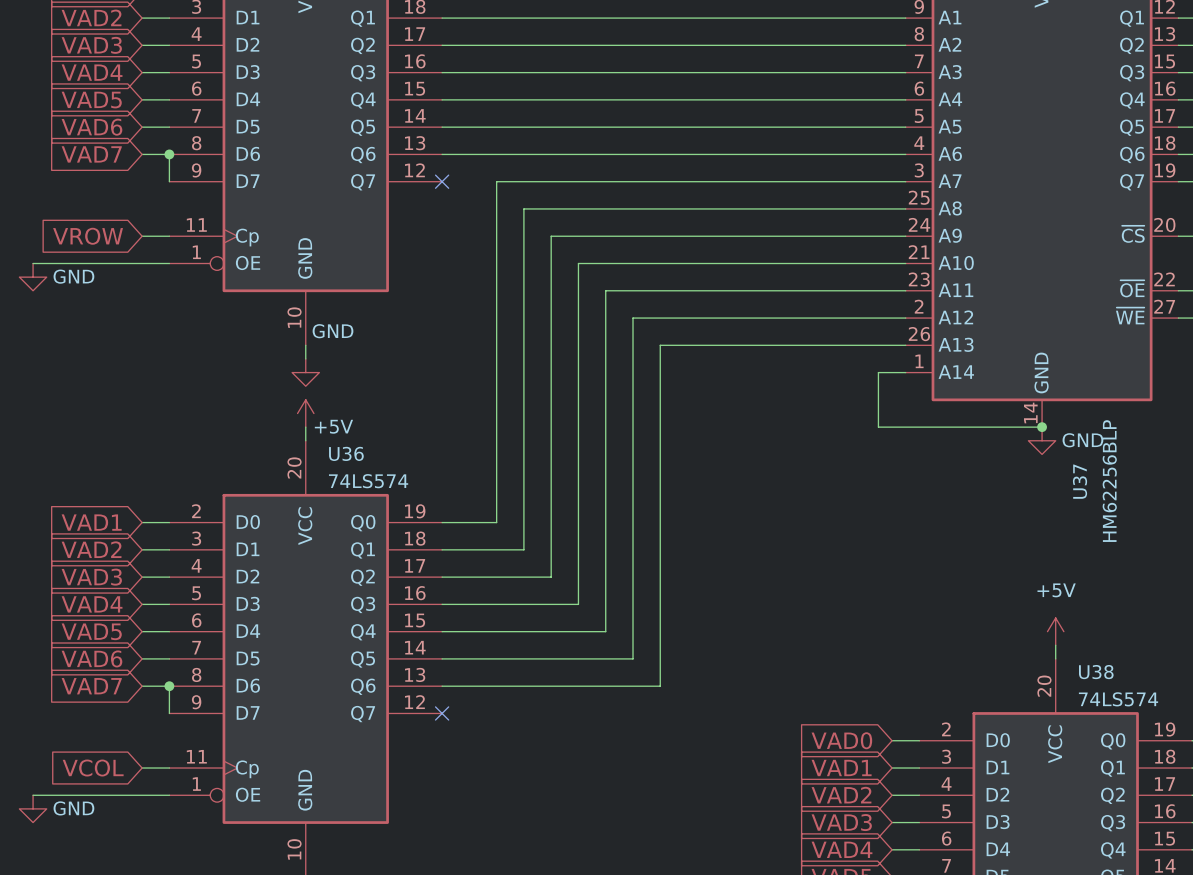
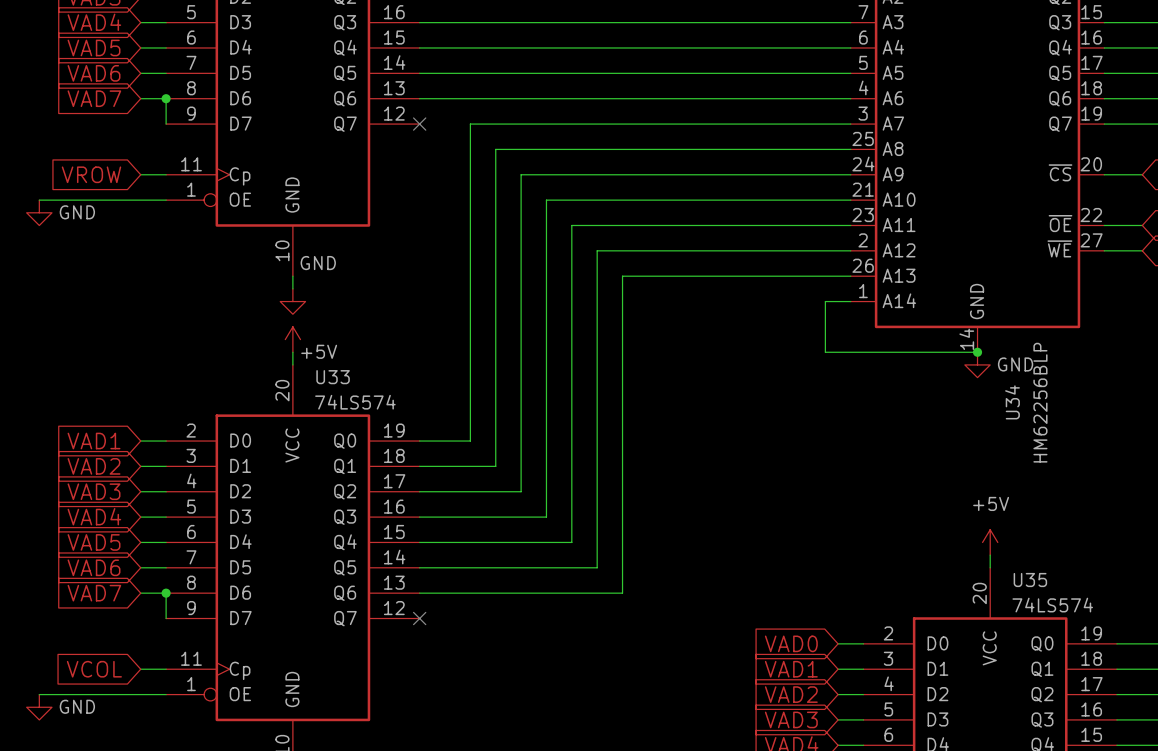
U36 name: U36 (346, 453) -> U33 (333, 377)
U37 name: U37 (1080, 481) -> U34 (1012, 402)
U38 name: U38 (1096, 672) -> U35 (1030, 580)

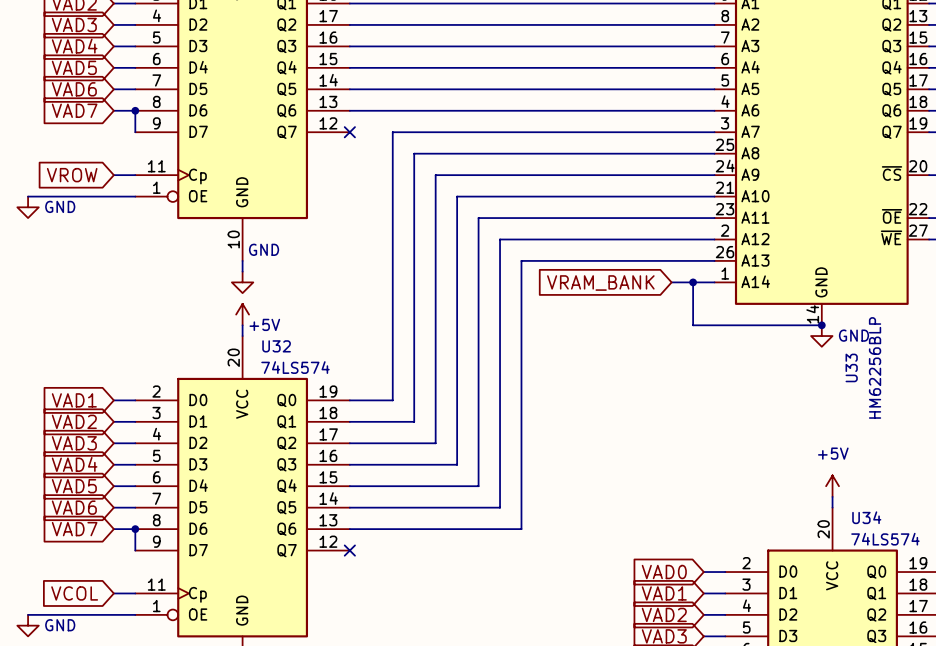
wire: none -> (671, 282) (693, 282)
junction: none -> (693, 282)
global label: none -> VRAM_BANK (600, 283)
U33 name: U33 (333, 377) -> U32 (276, 346)
U34 name: U34 (1012, 402) -> U33 (851, 367)
U35 name: U35 (1030, 580) -> U34 (866, 517)

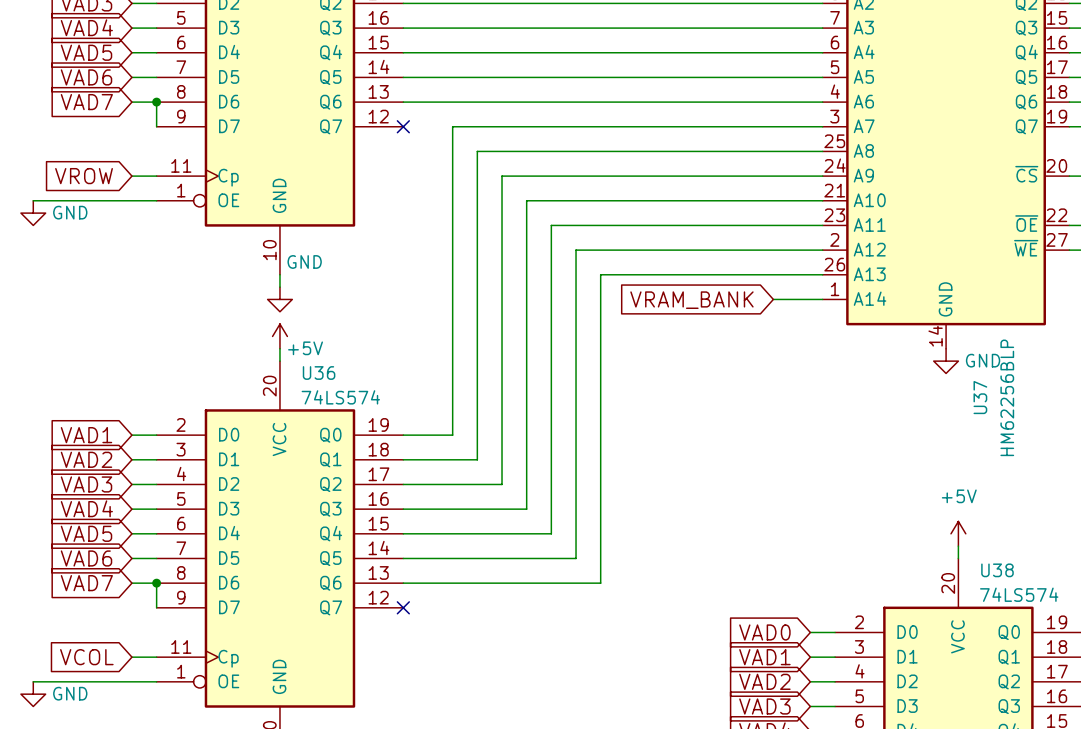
wire: (693, 282) (693, 325) (821, 325) -> none
junction: (693, 282) -> none
junction: (821, 325) -> none
U32 name: U32 (276, 346) -> U36 (319, 372)
U33 name: U33 (851, 367) -> U37 (980, 397)
U34 name: U34 (866, 517) -> U38 (997, 570)

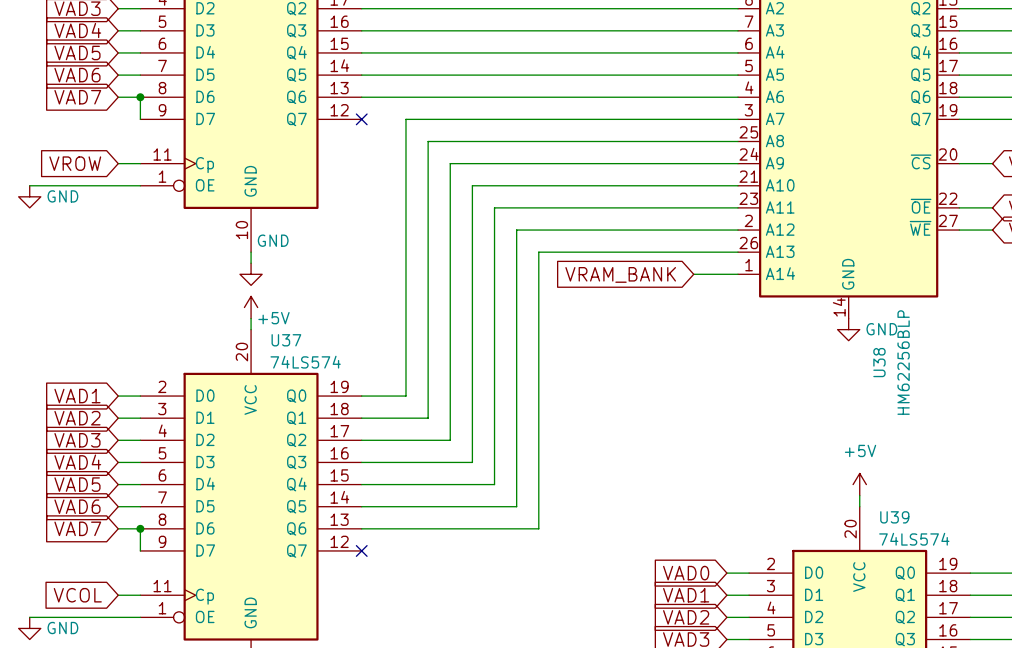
U36 name: U36 (319, 372) -> U37 (286, 340)
U37 name: U37 (980, 397) -> U38 (879, 362)
U38 name: U38 (997, 570) -> U39 (894, 517)

